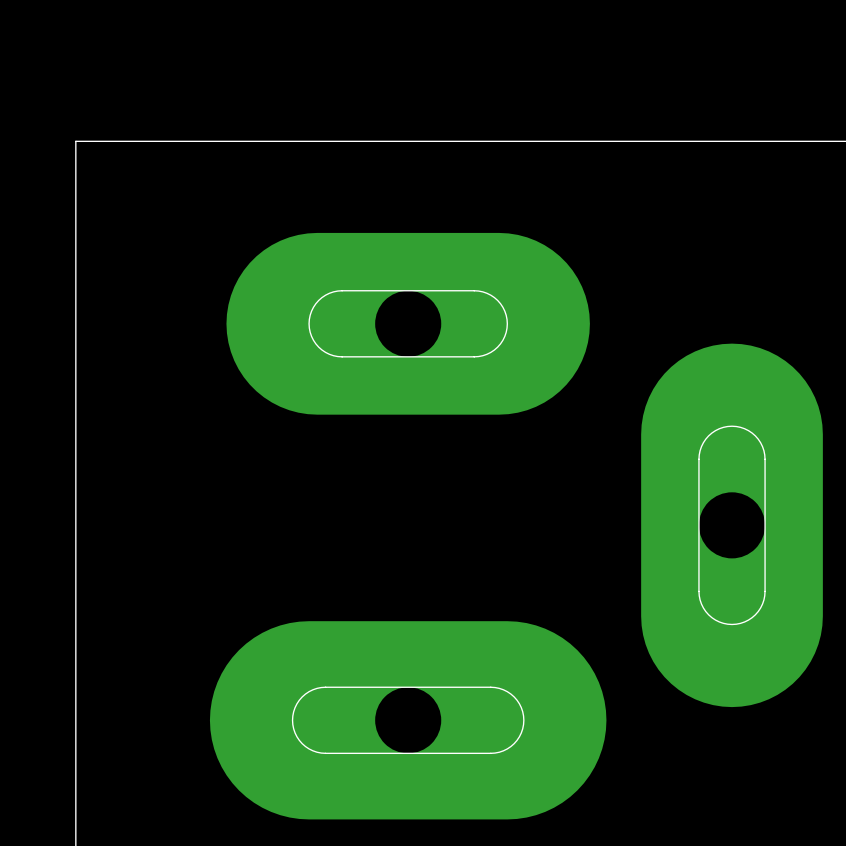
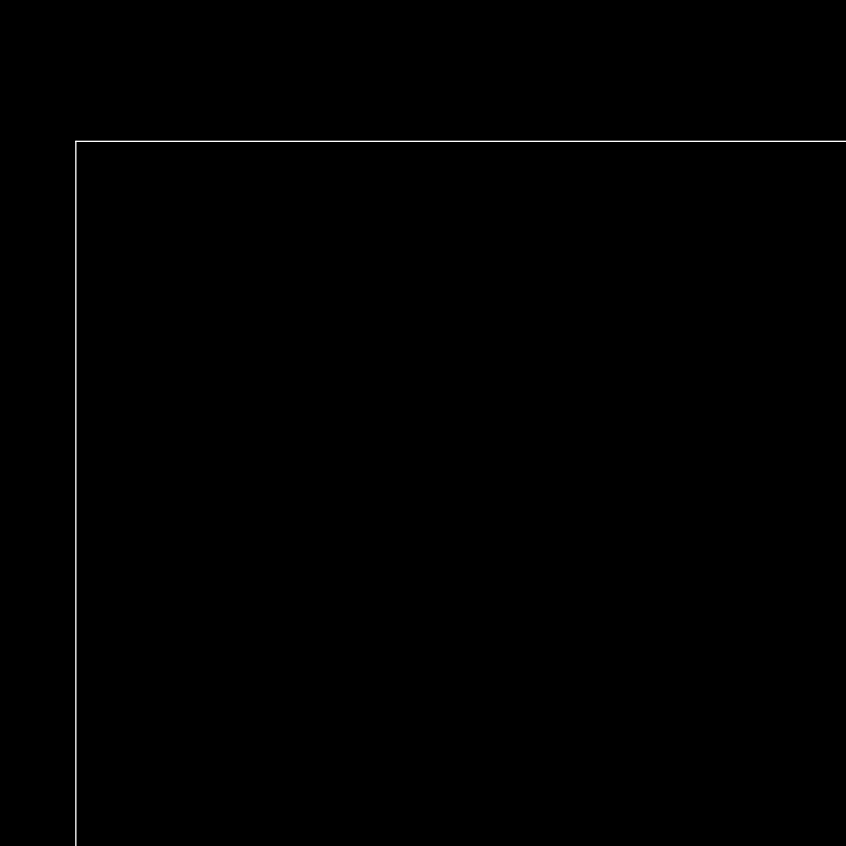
part: (516, 526) -> none

